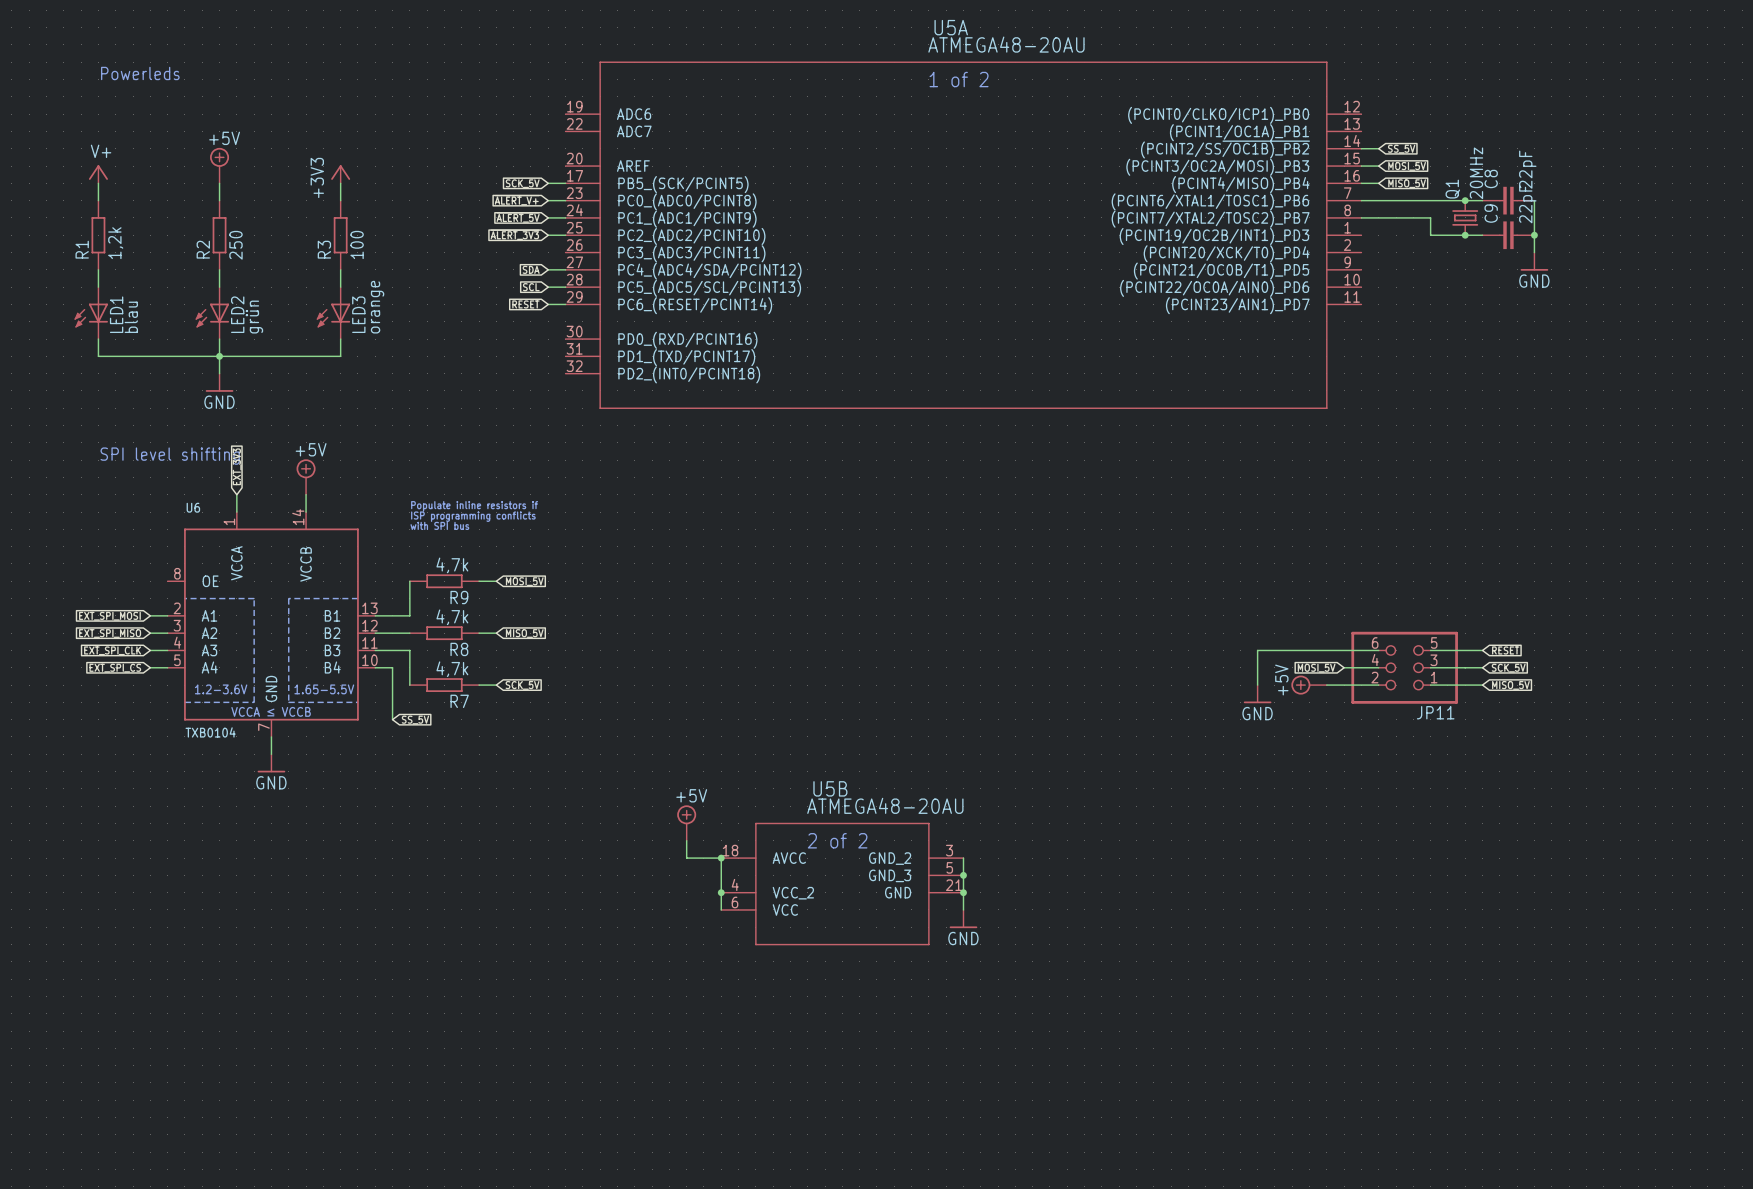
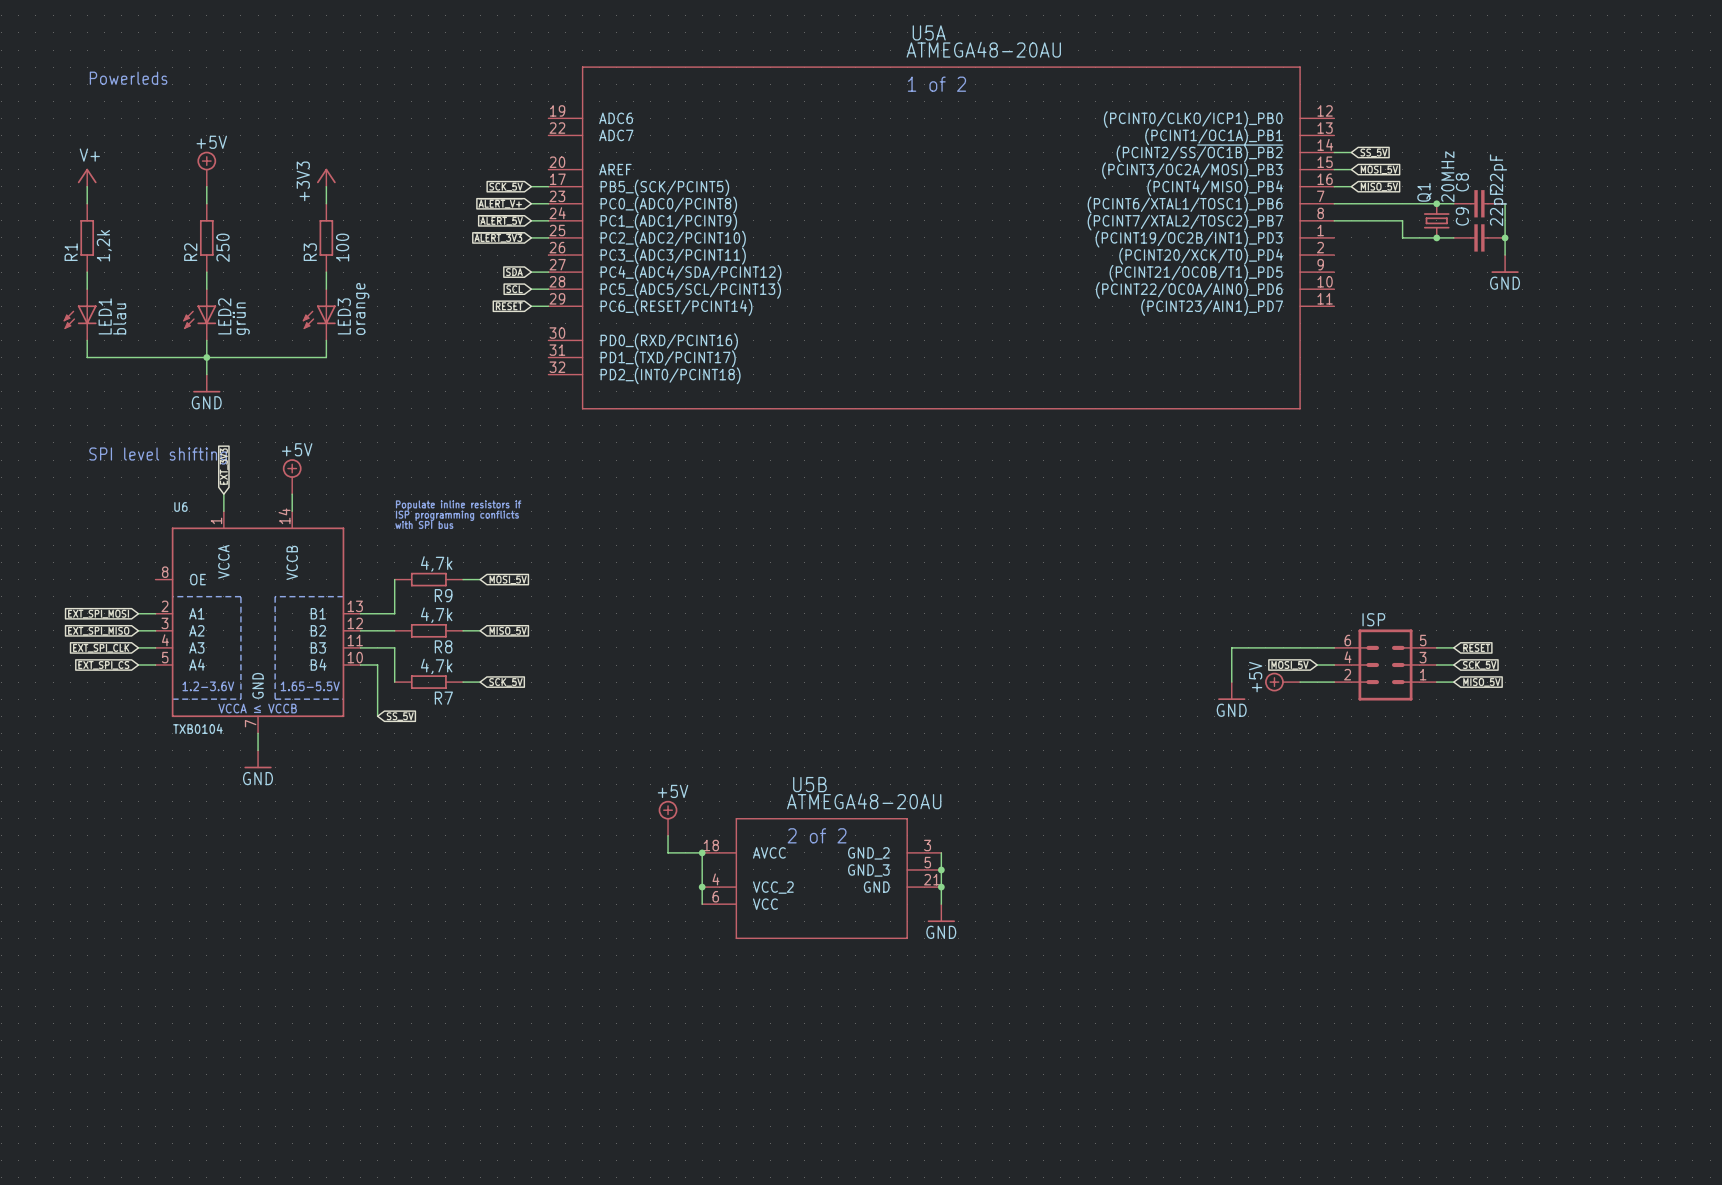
JP11: (1404, 667) -> none
ISP: none -> (1385, 665)

